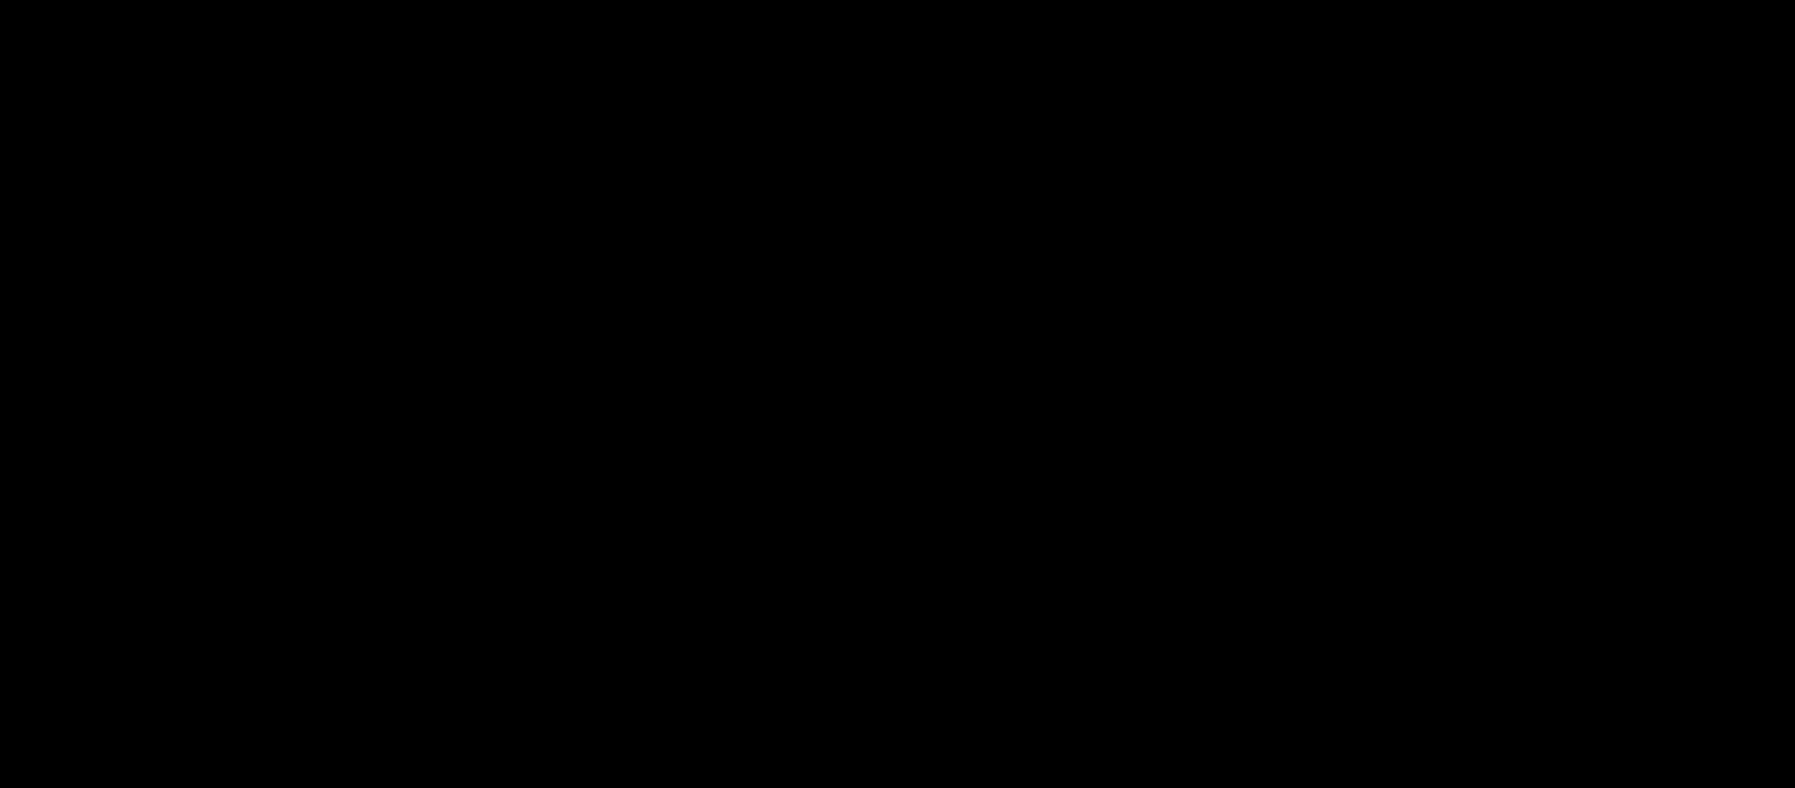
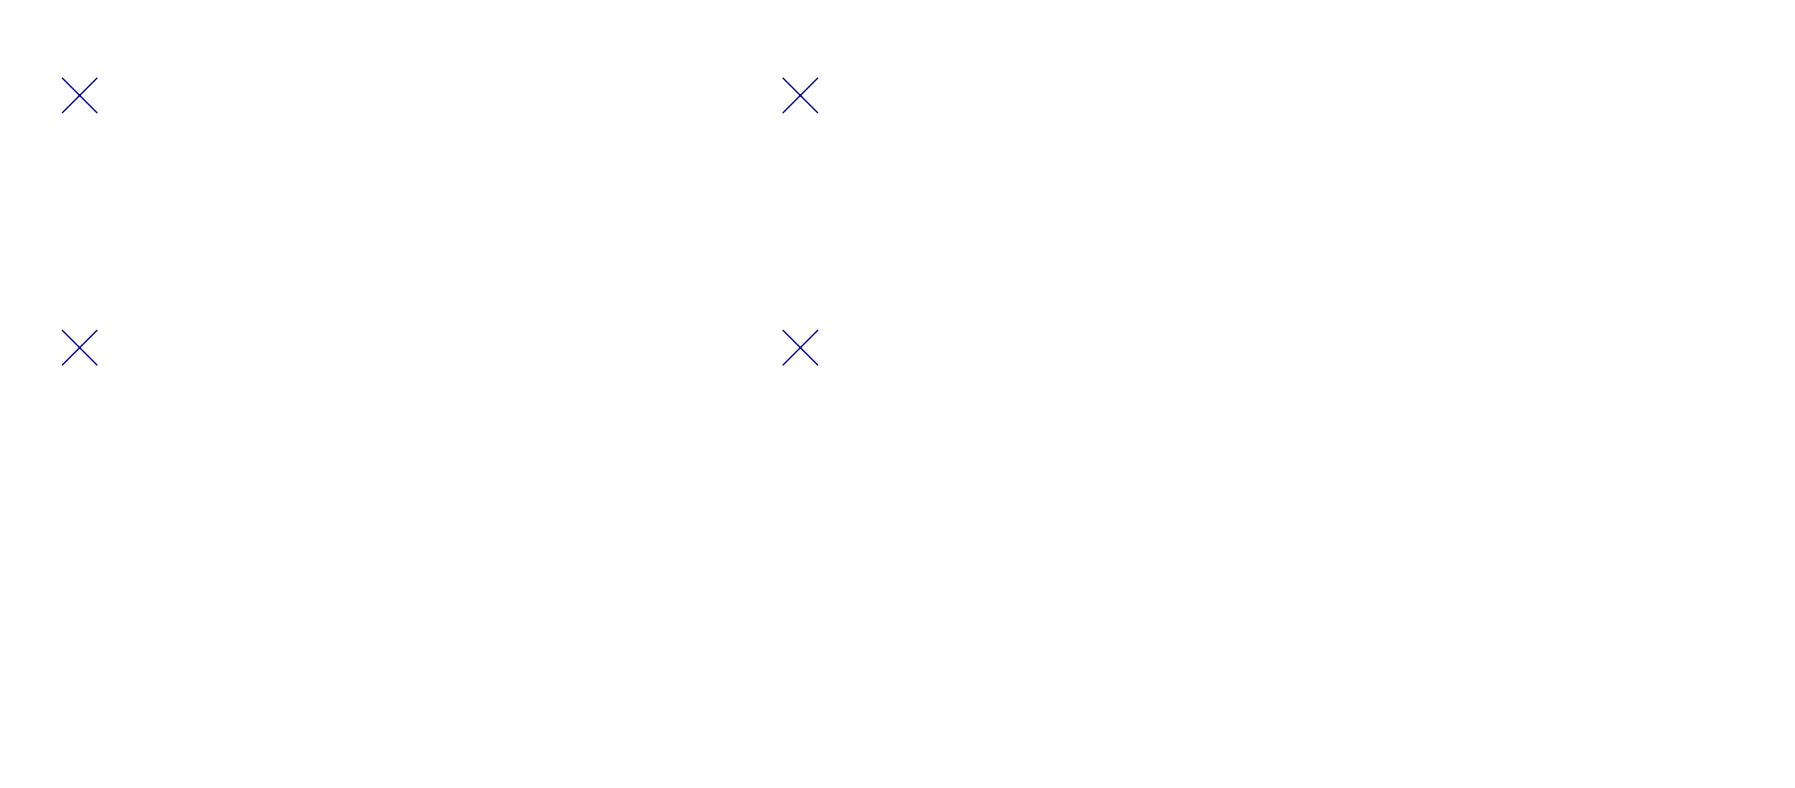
no-connect mark: none -> (79, 95)
no-connect mark: none -> (800, 95)
no-connect mark: none -> (79, 347)
no-connect mark: none -> (800, 347)

